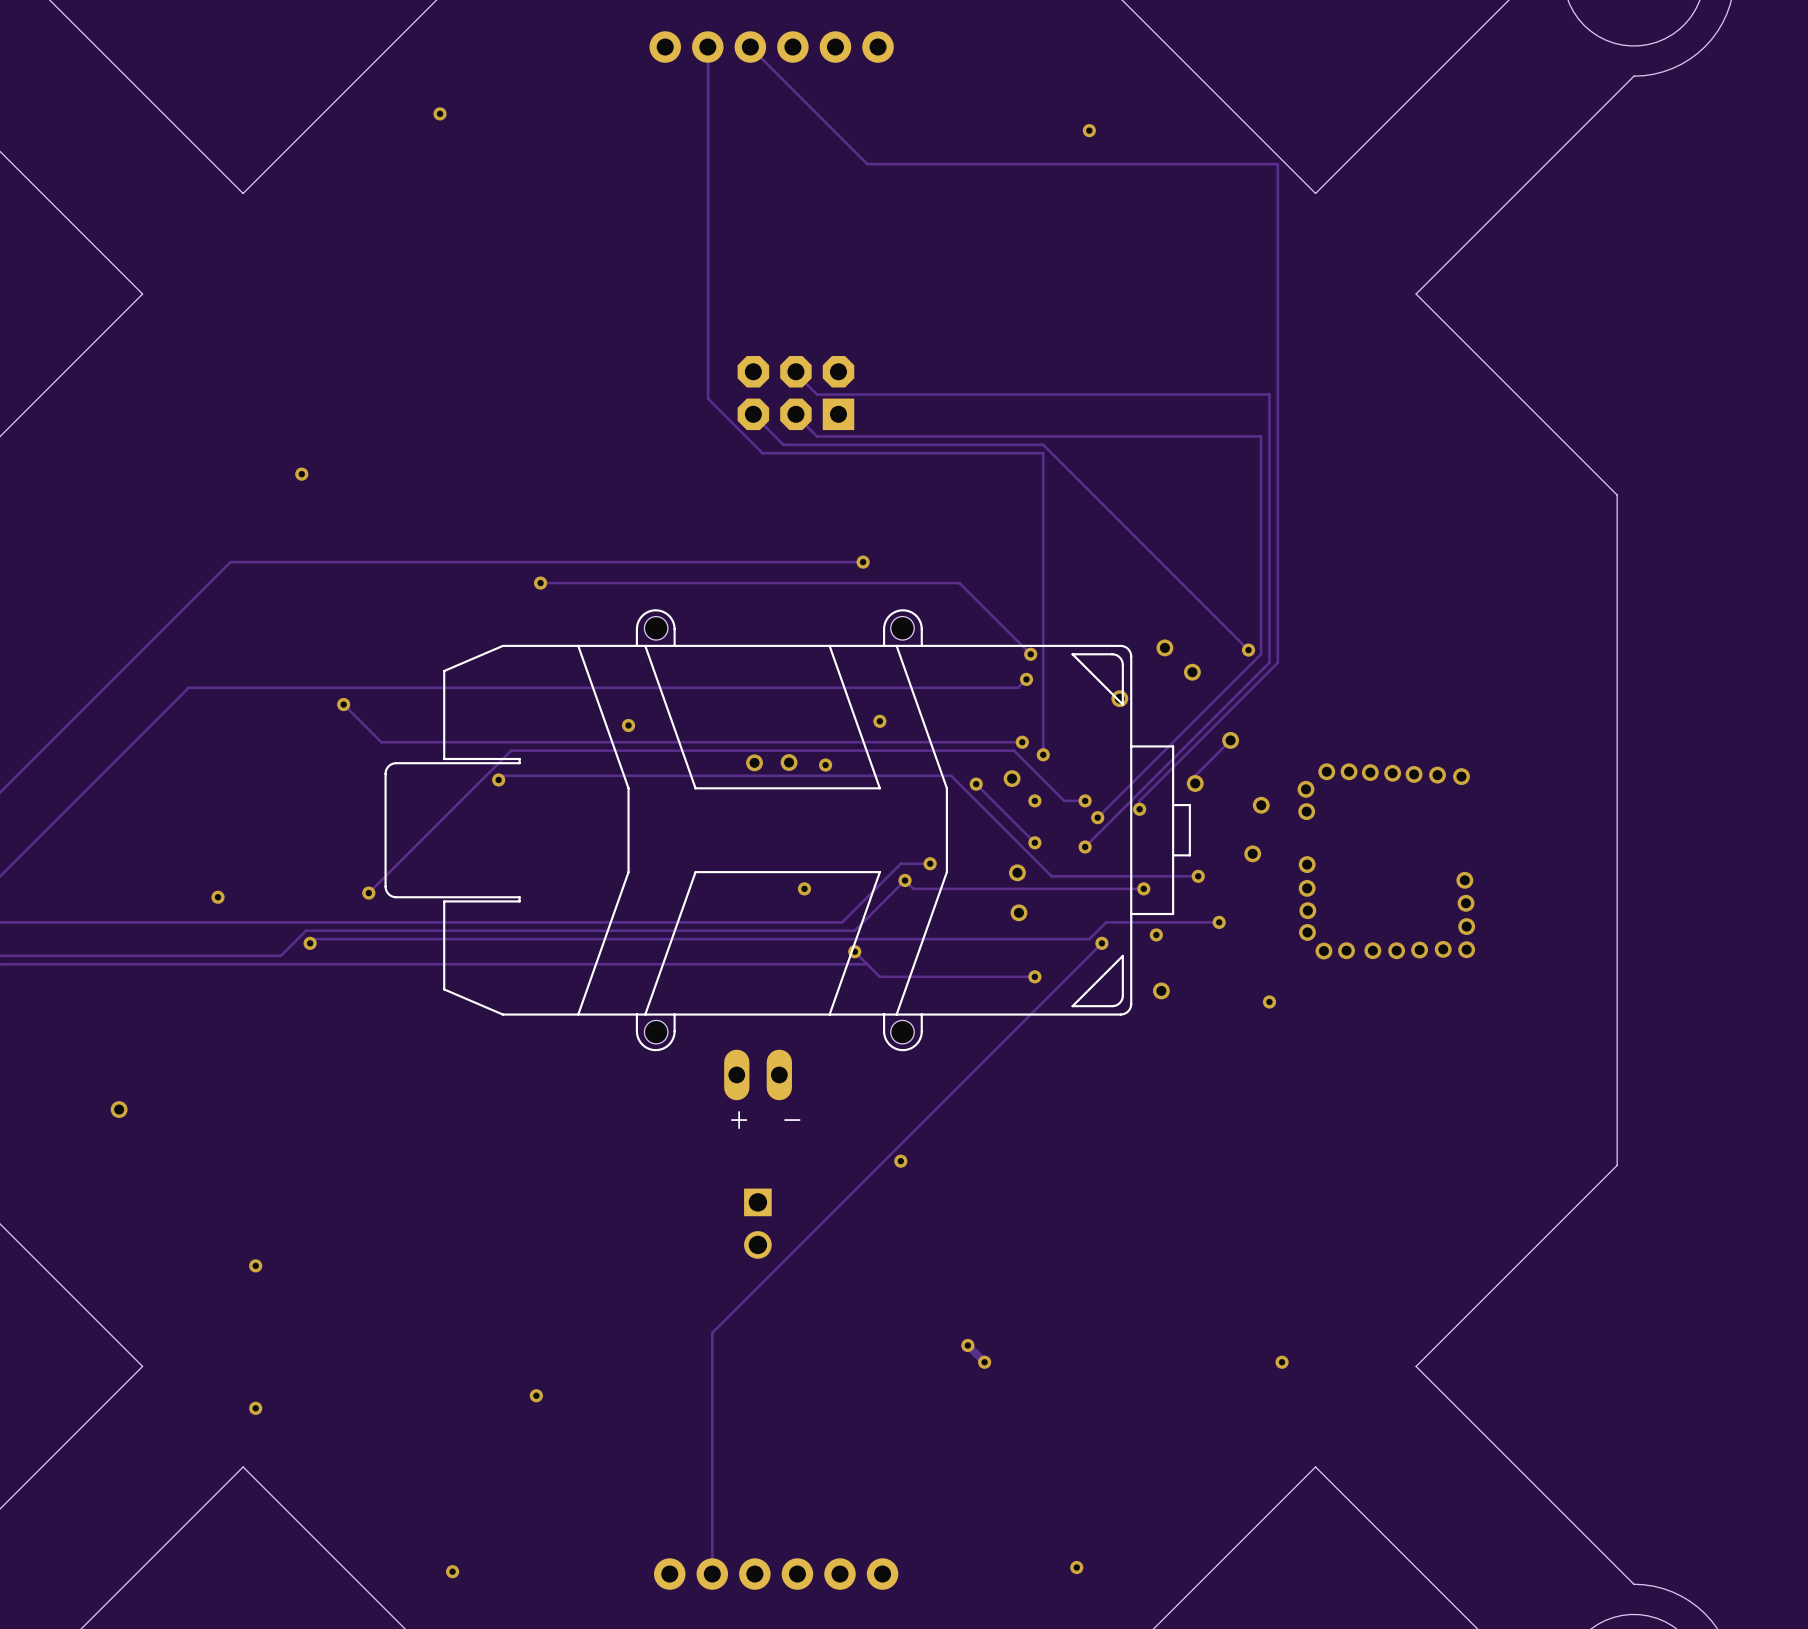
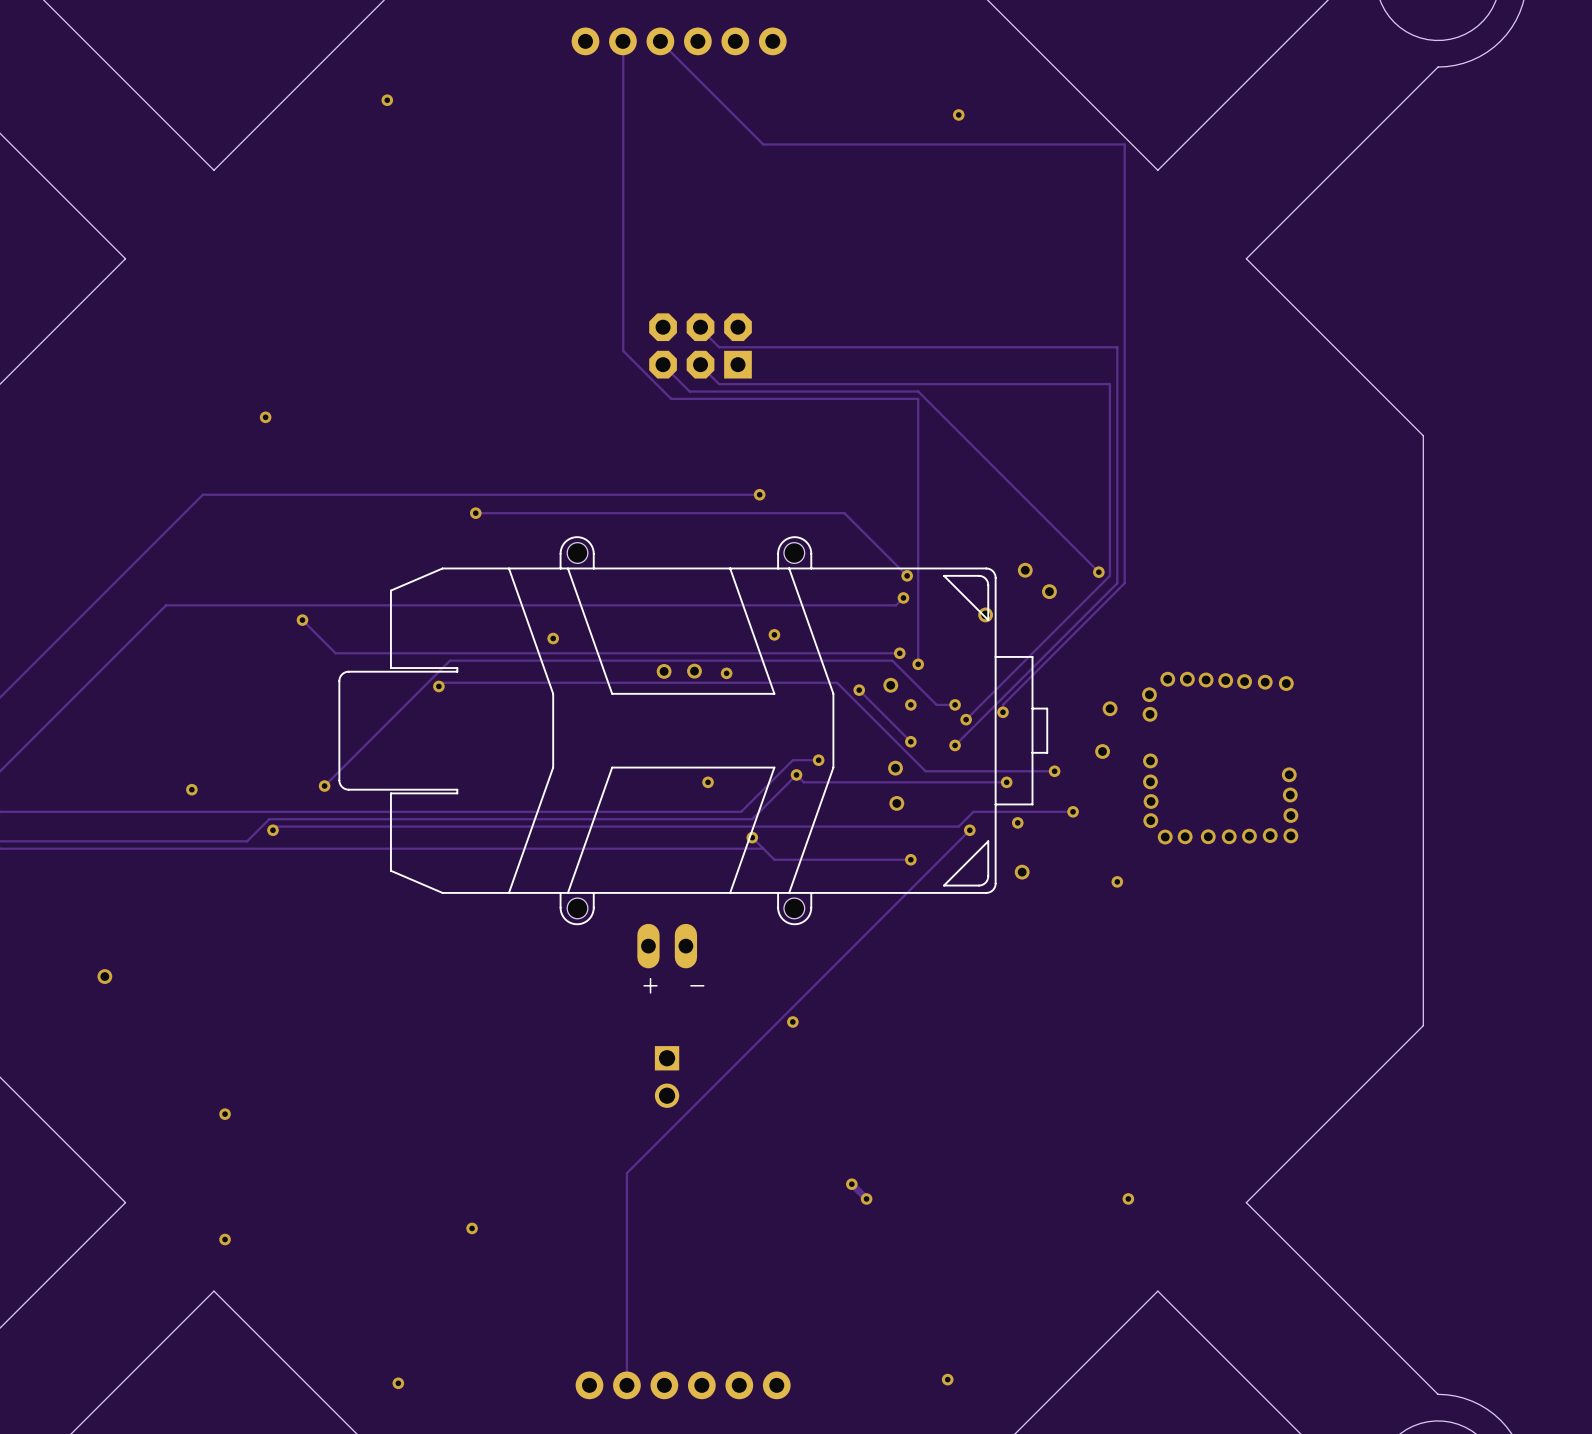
track: (1230, 740) (1195, 775) (1195, 783) -> none
via: (1230, 740) -> none
via: (1195, 783) -> none

